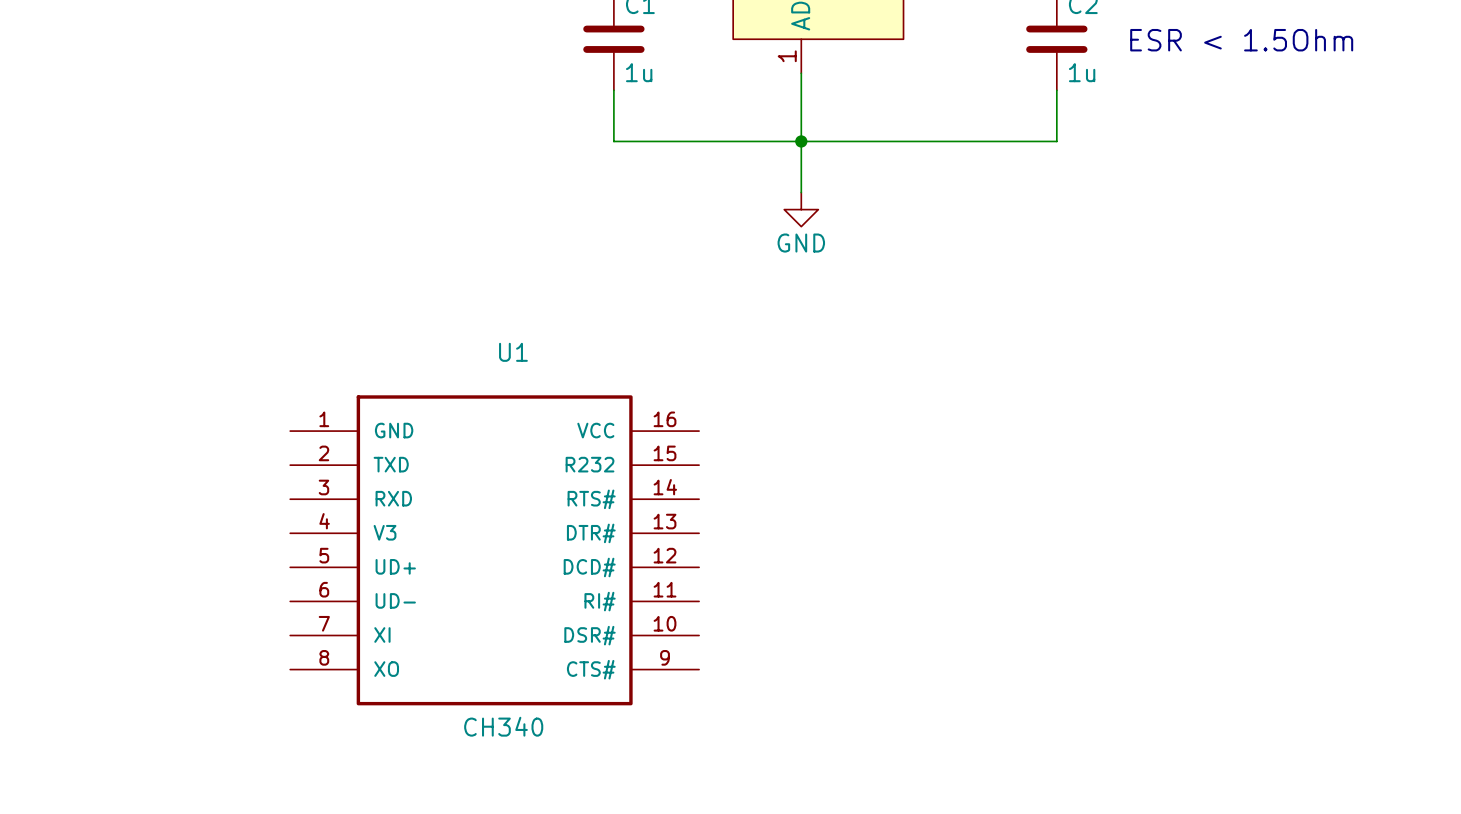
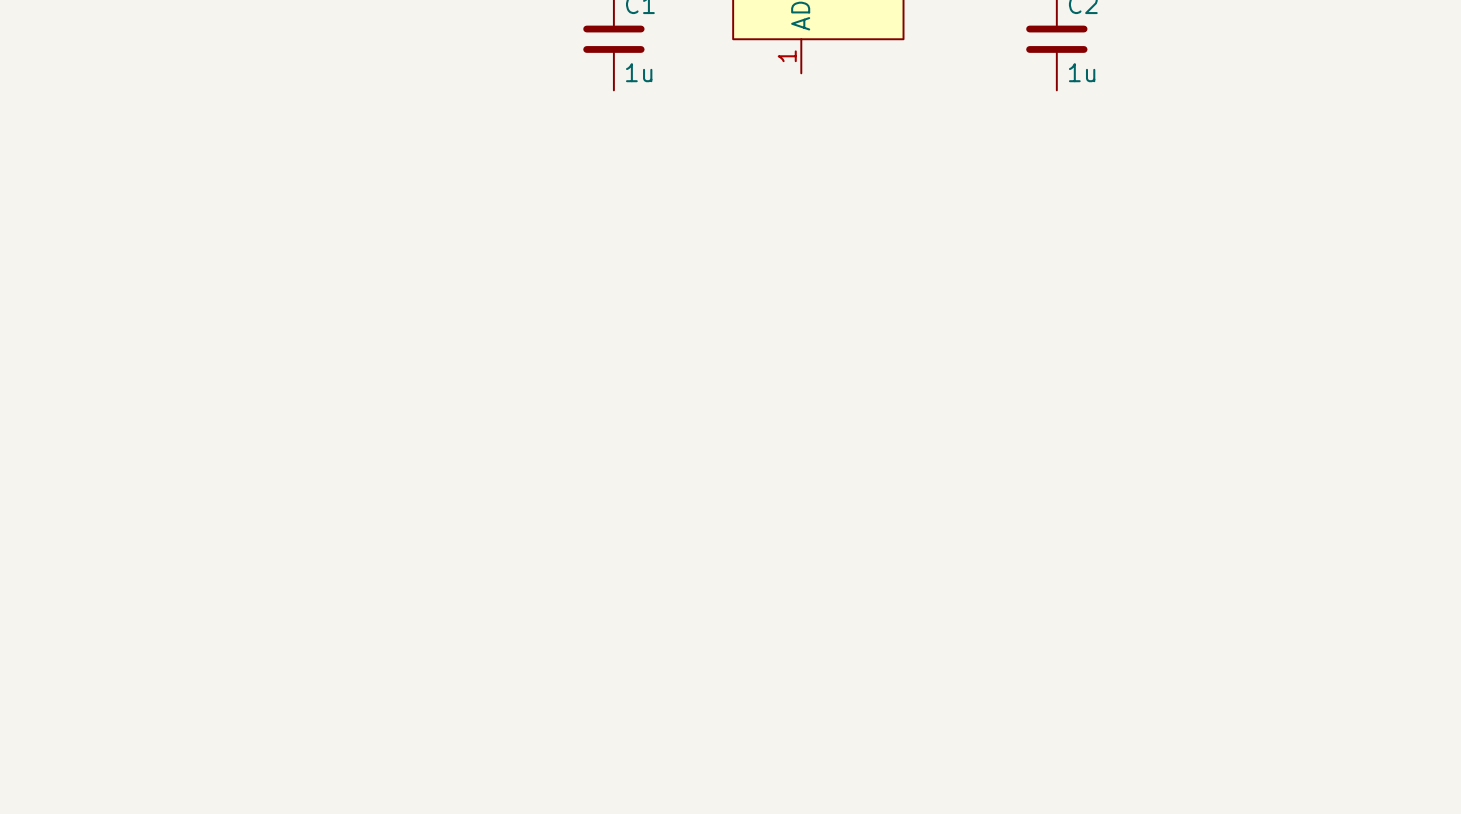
text: ESR < 1.5Ohm (1241, 40) -> none
wire: (801, 73) (801, 192) -> none
wire: (613, 90) (613, 141) (1056, 141) (1056, 90) -> none
junction: (801, 141) -> none
power symbol: GND (801, 209) -> none
U1: CH340 (494, 550) -> none

